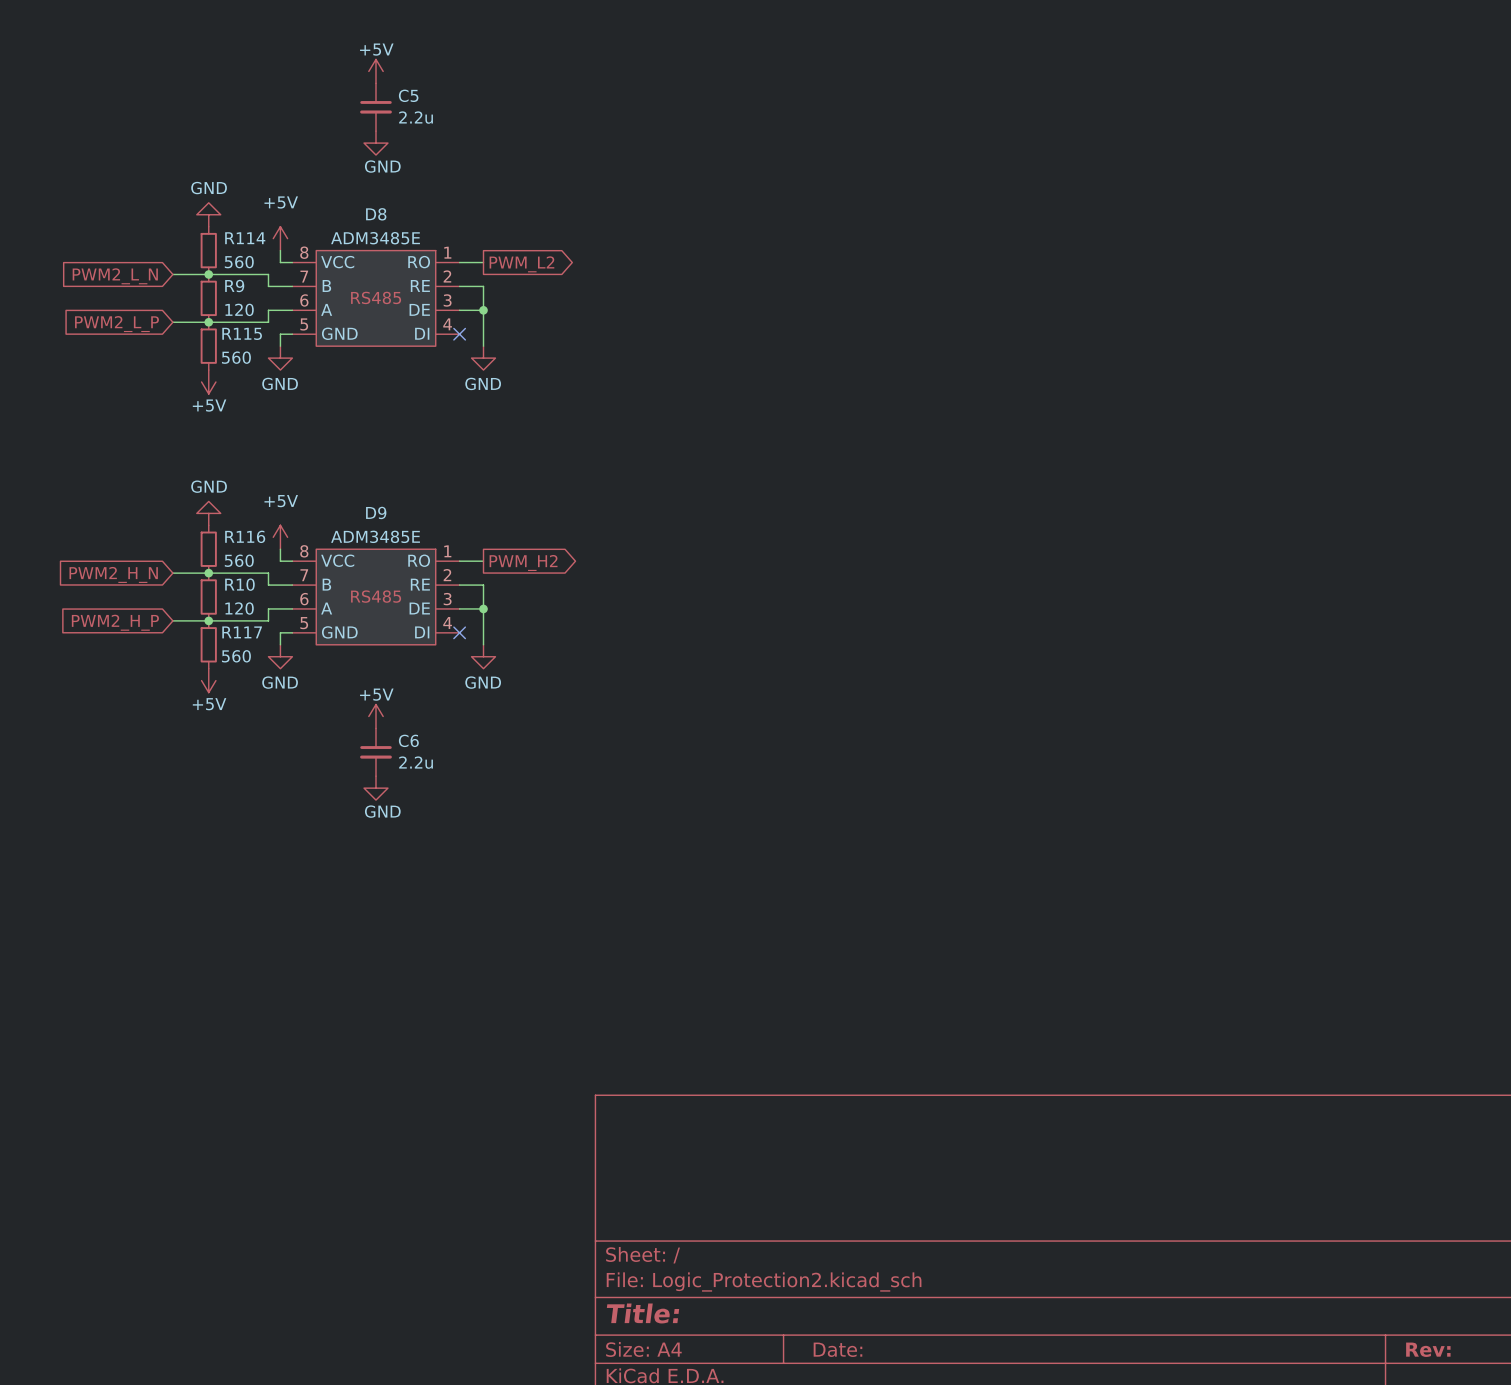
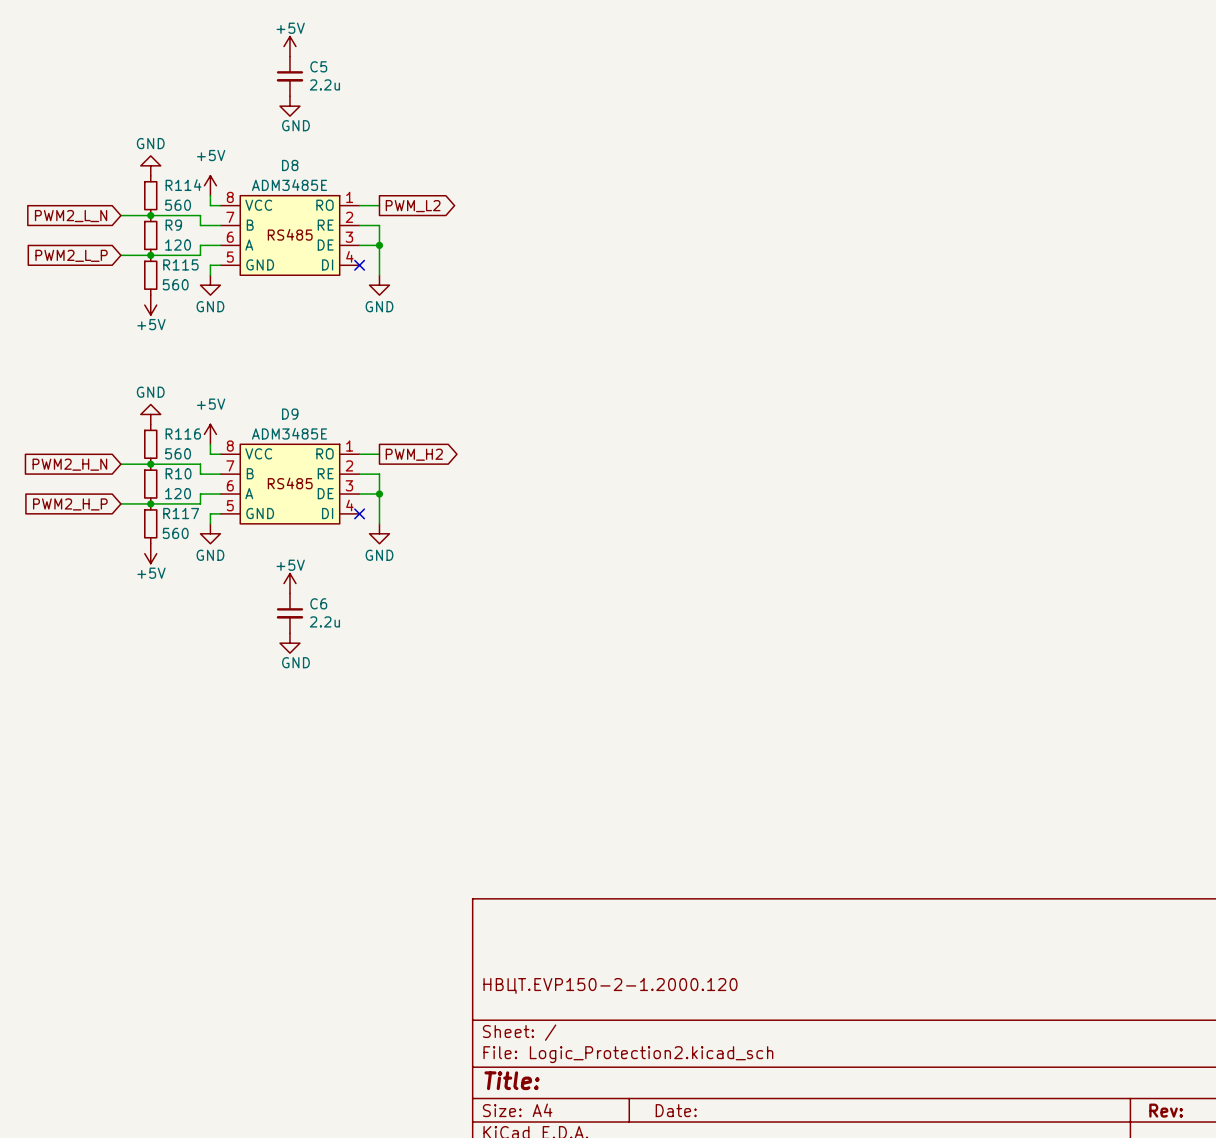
title block: none -> НВЦТ.EVP150-2-1.2000.120 (610, 985)

